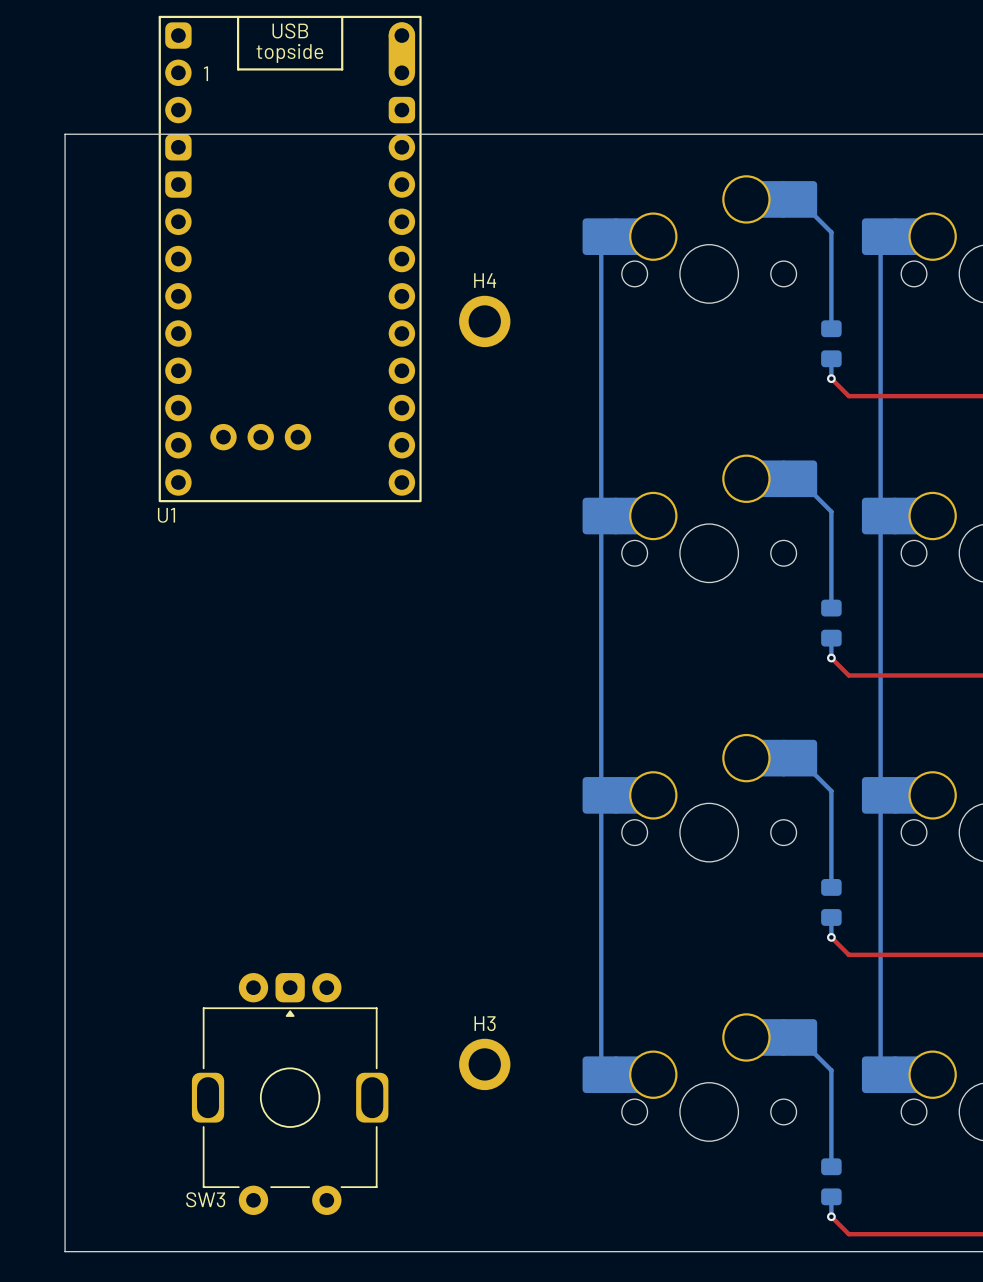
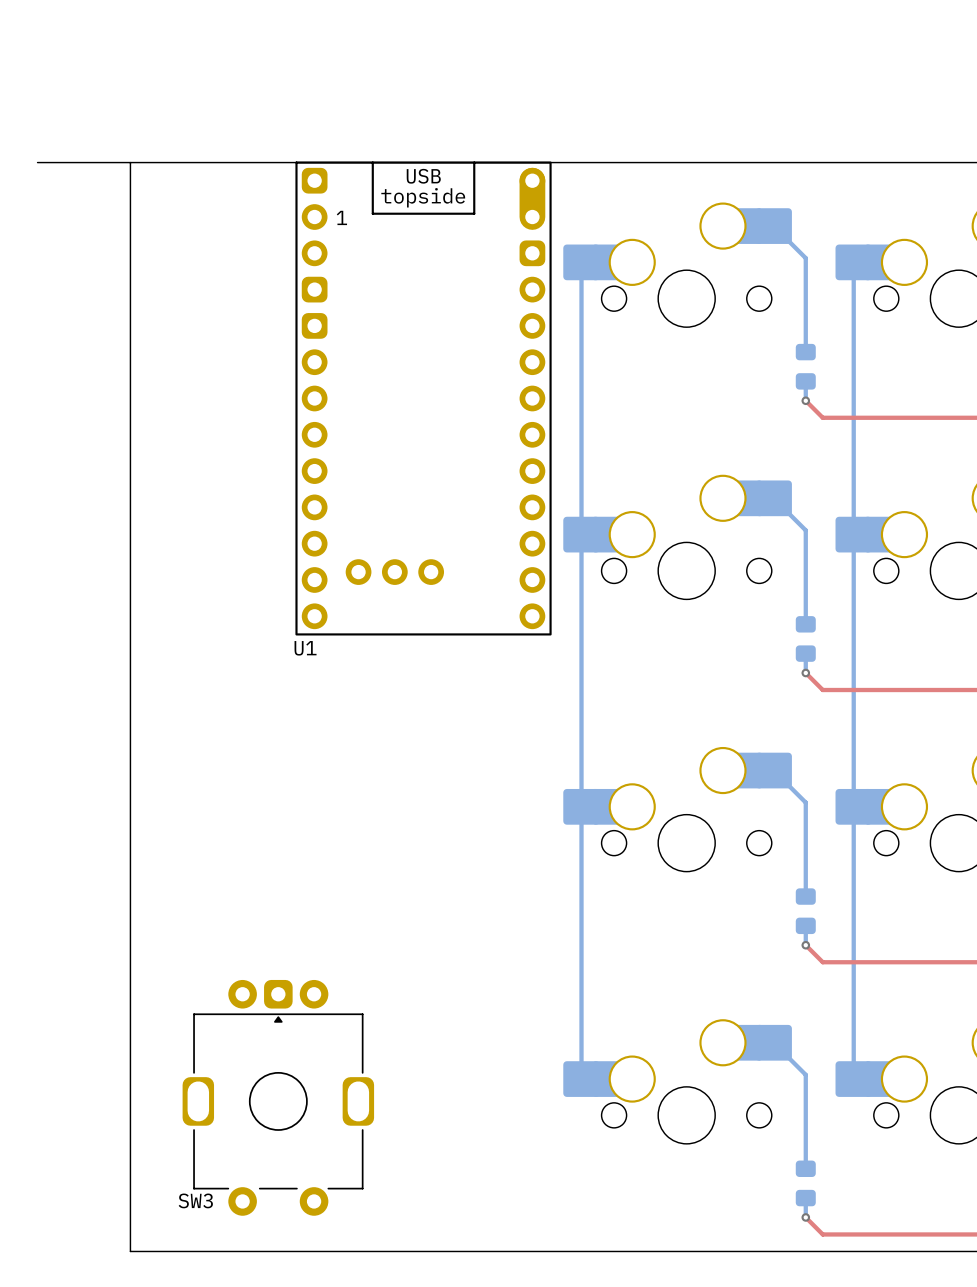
board edge: none -> (37, 162) (58, 162)
board edge: (65, 134) (65, 1251) (138, 1251) -> (130, 162) (130, 1251)
U1 position: (290, 259) -> (423, 398)
H4: (484, 321) -> none
H3: (484, 1064) -> none

